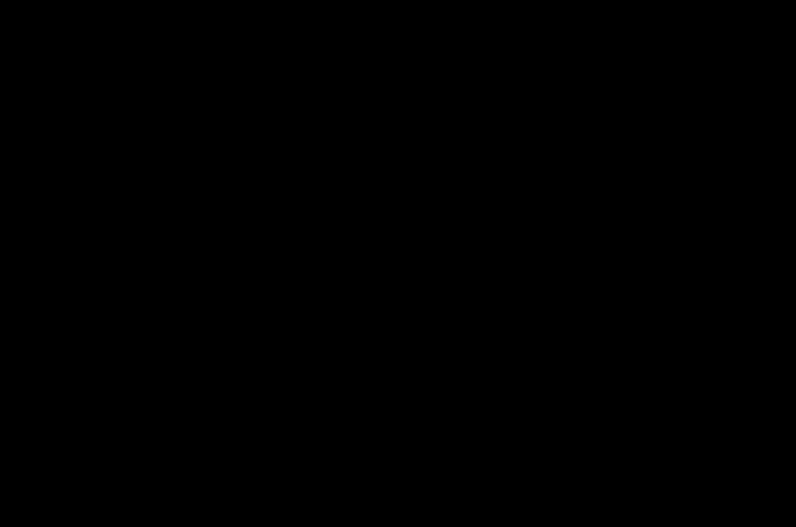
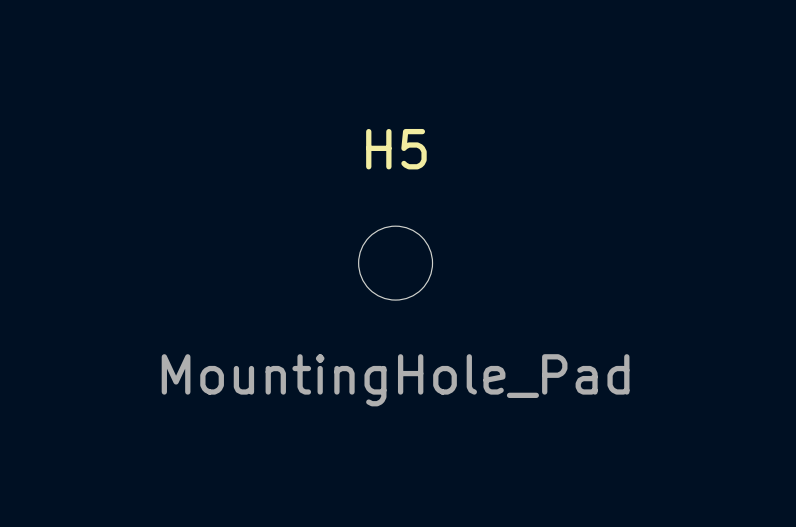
H5: none -> MountingHole_Pad (395, 263)

